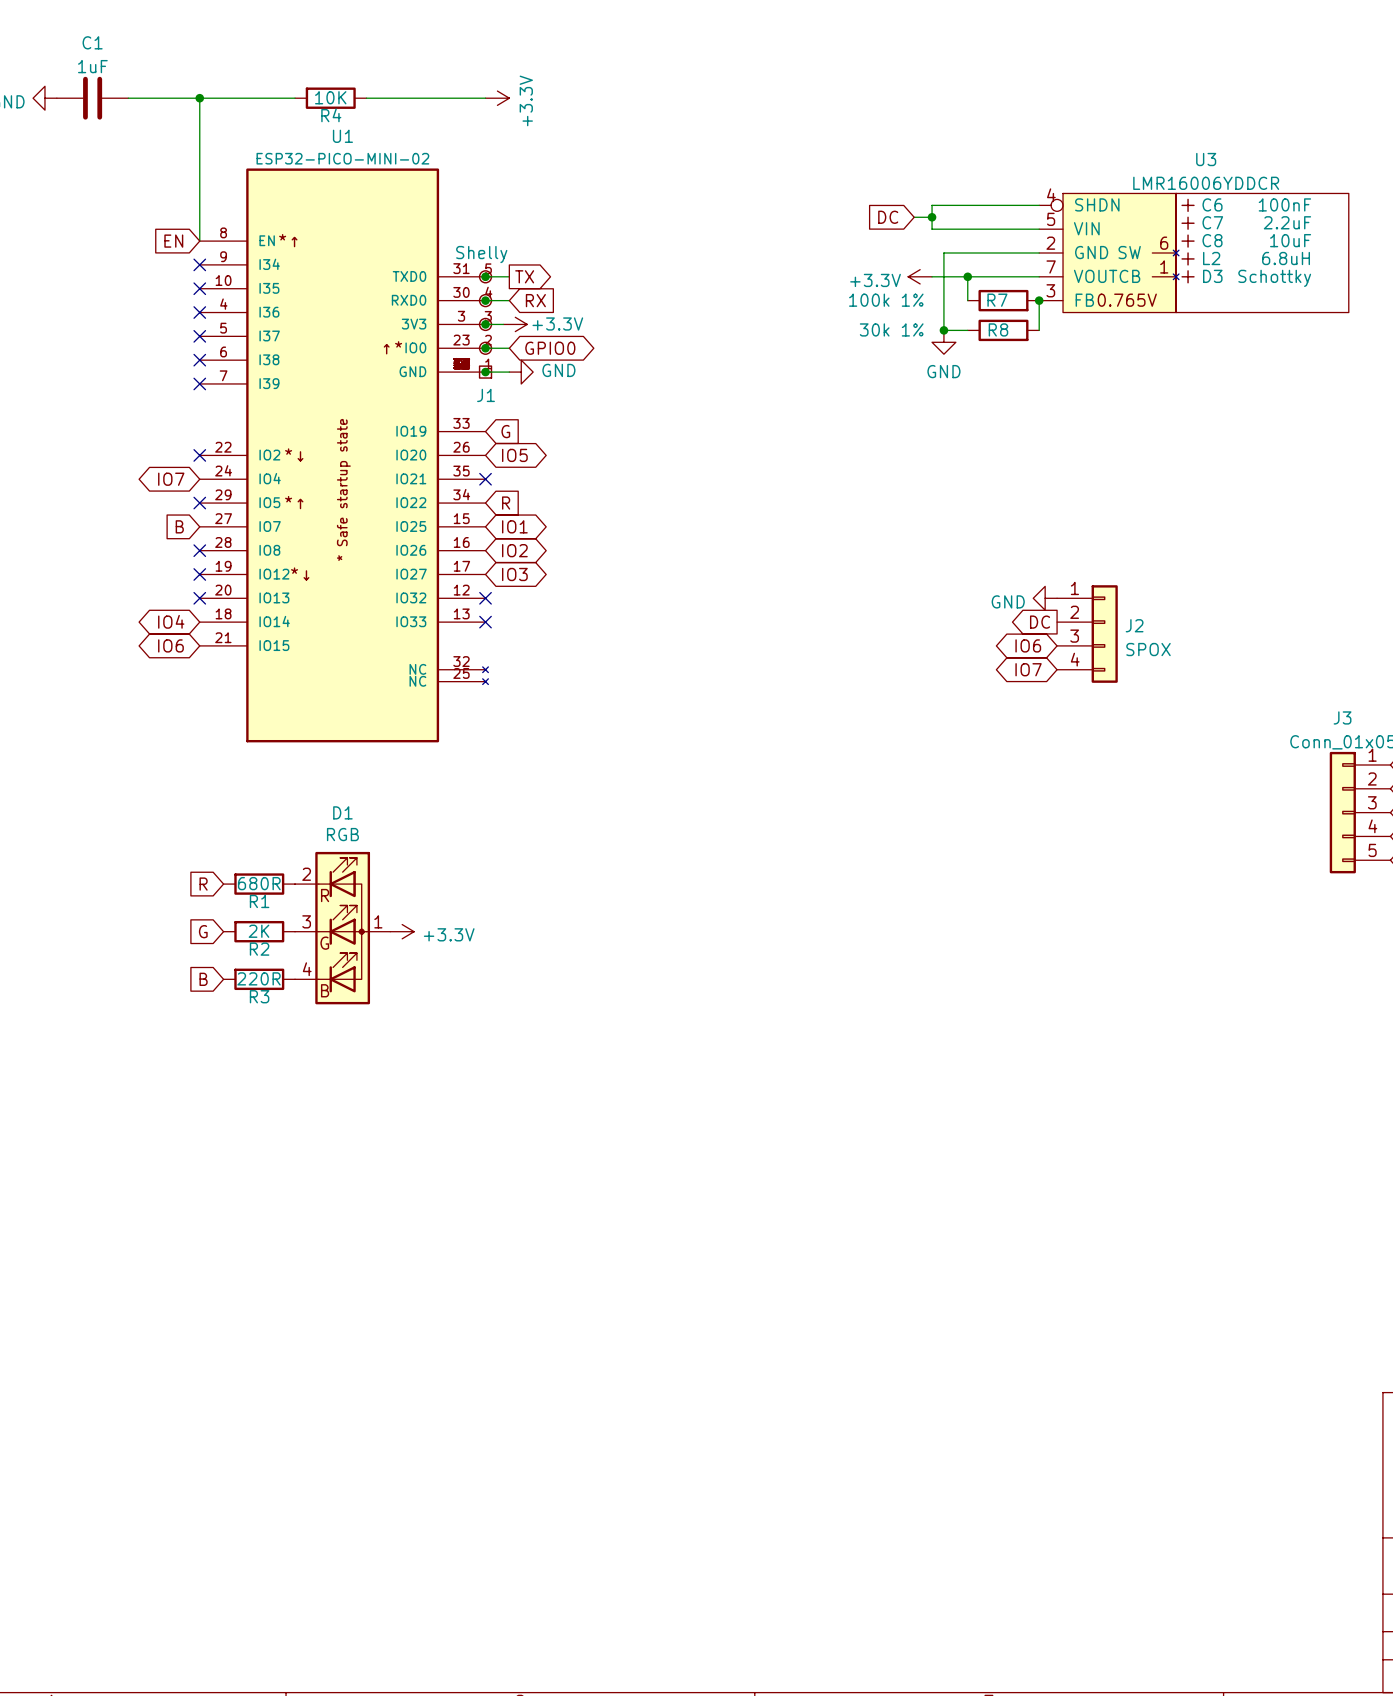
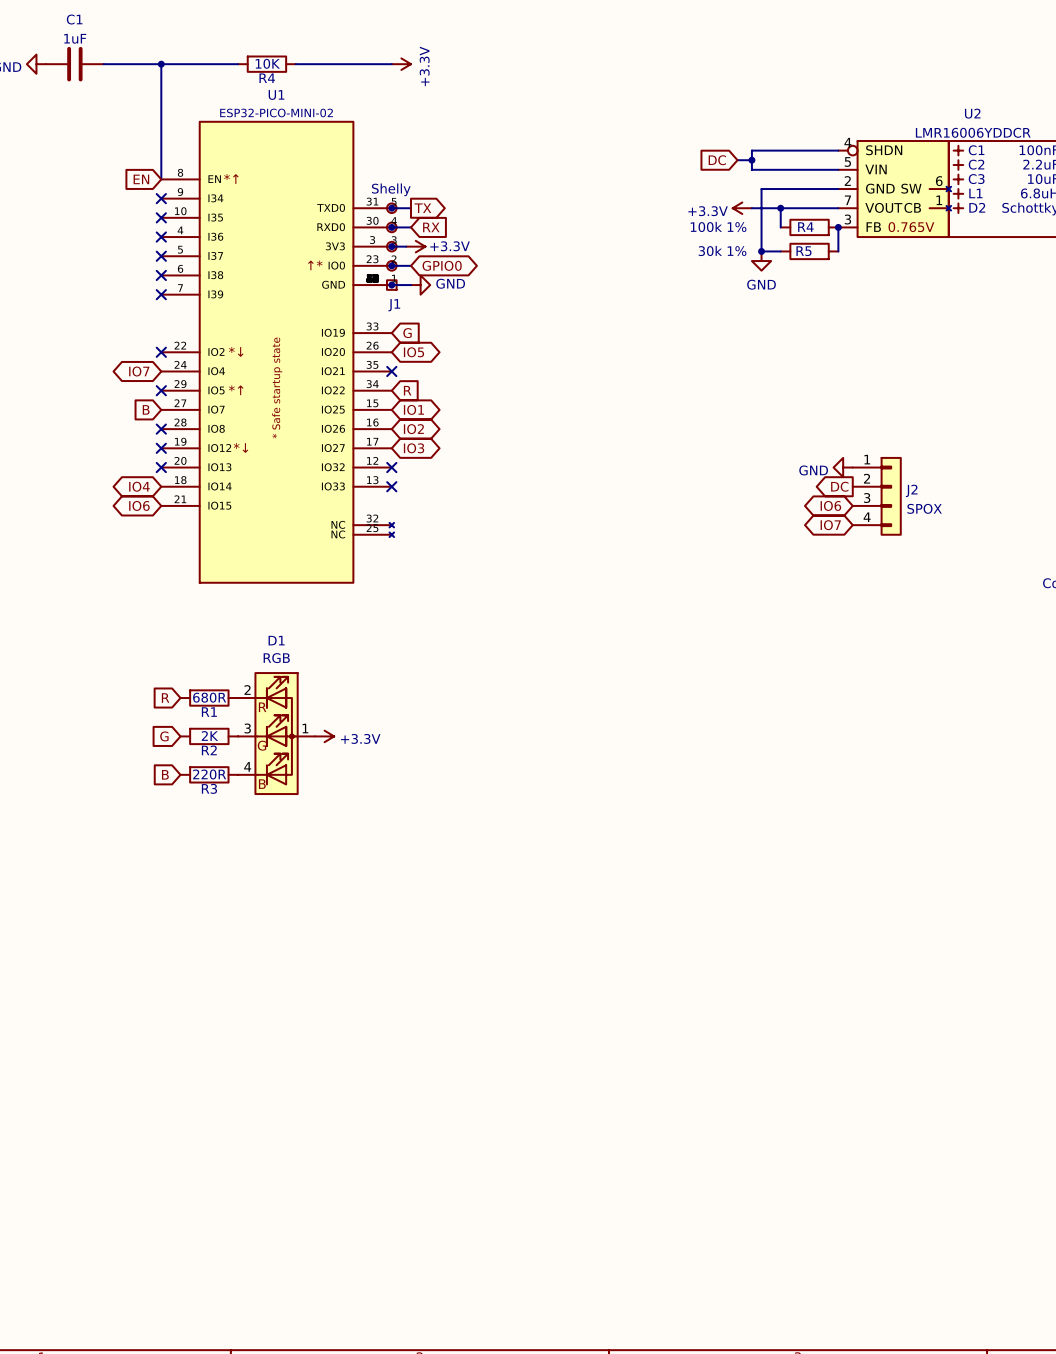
U3 name: U3 (1206, 159) -> U2 (972, 113)
C6 name: C6 (1212, 204) -> C1 (976, 150)
C7 name: C7 (1212, 222) -> C2 (976, 164)
C8 name: C8 (1212, 240) -> C3 (976, 179)
L2 name: L2 (1211, 258) -> L1 (975, 193)
D3 name: D3 (1212, 276) -> D2 (977, 207)
R7 name: R7 (997, 300) -> R4 (805, 227)
R8 name: R8 (998, 329) -> R5 (803, 251)

